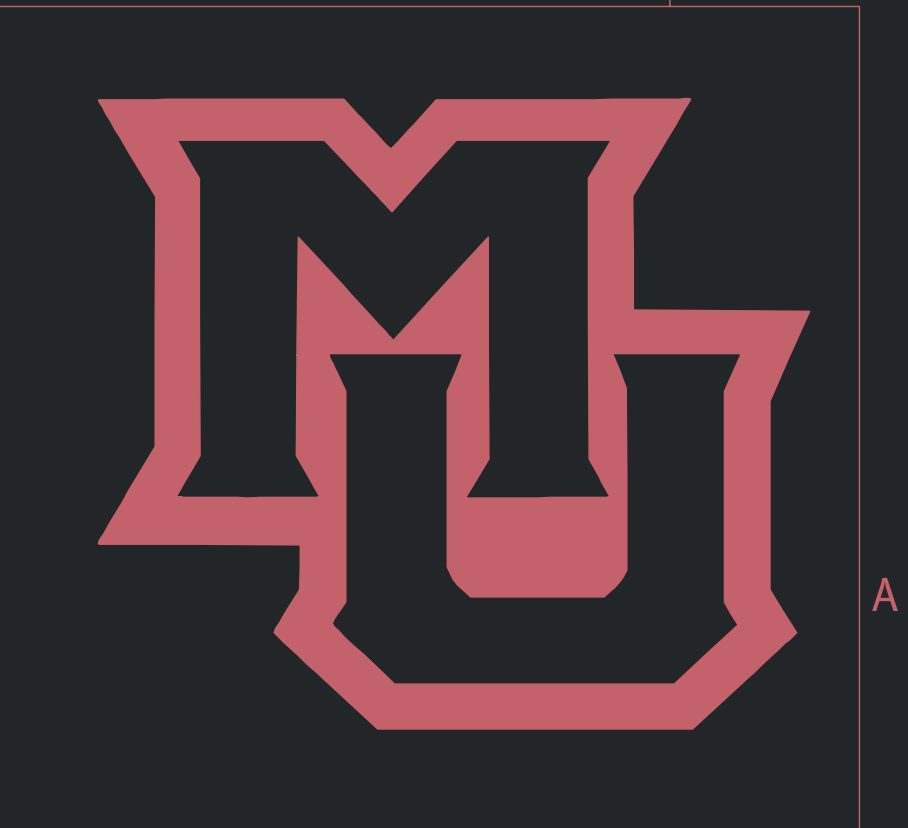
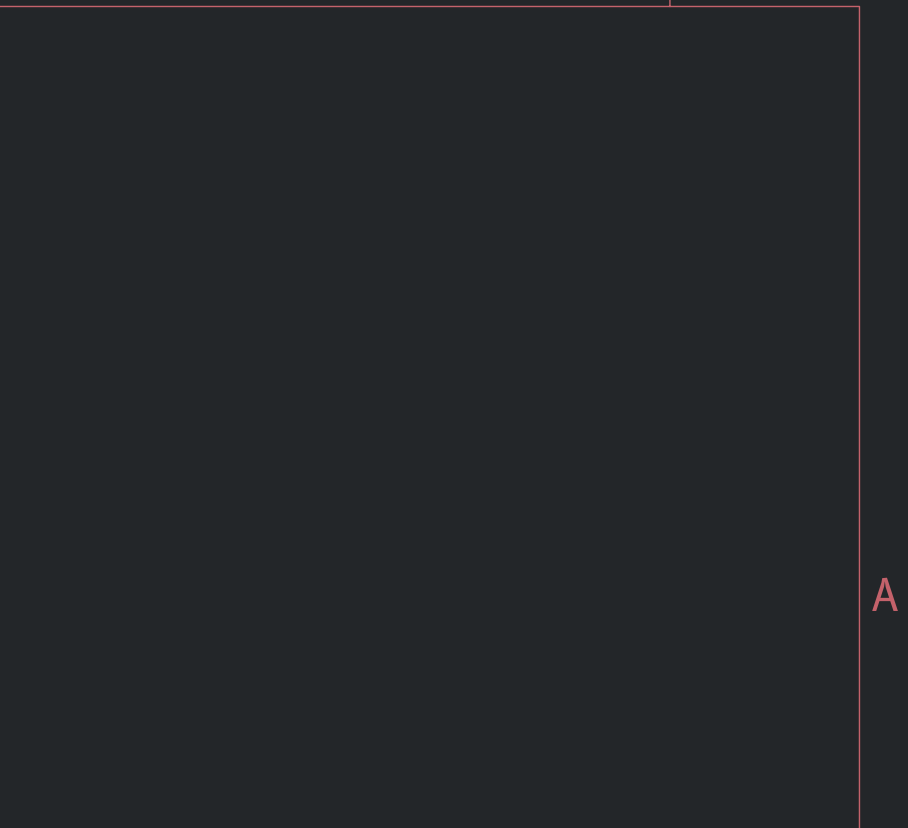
power symbol: (454, 413) -> none

